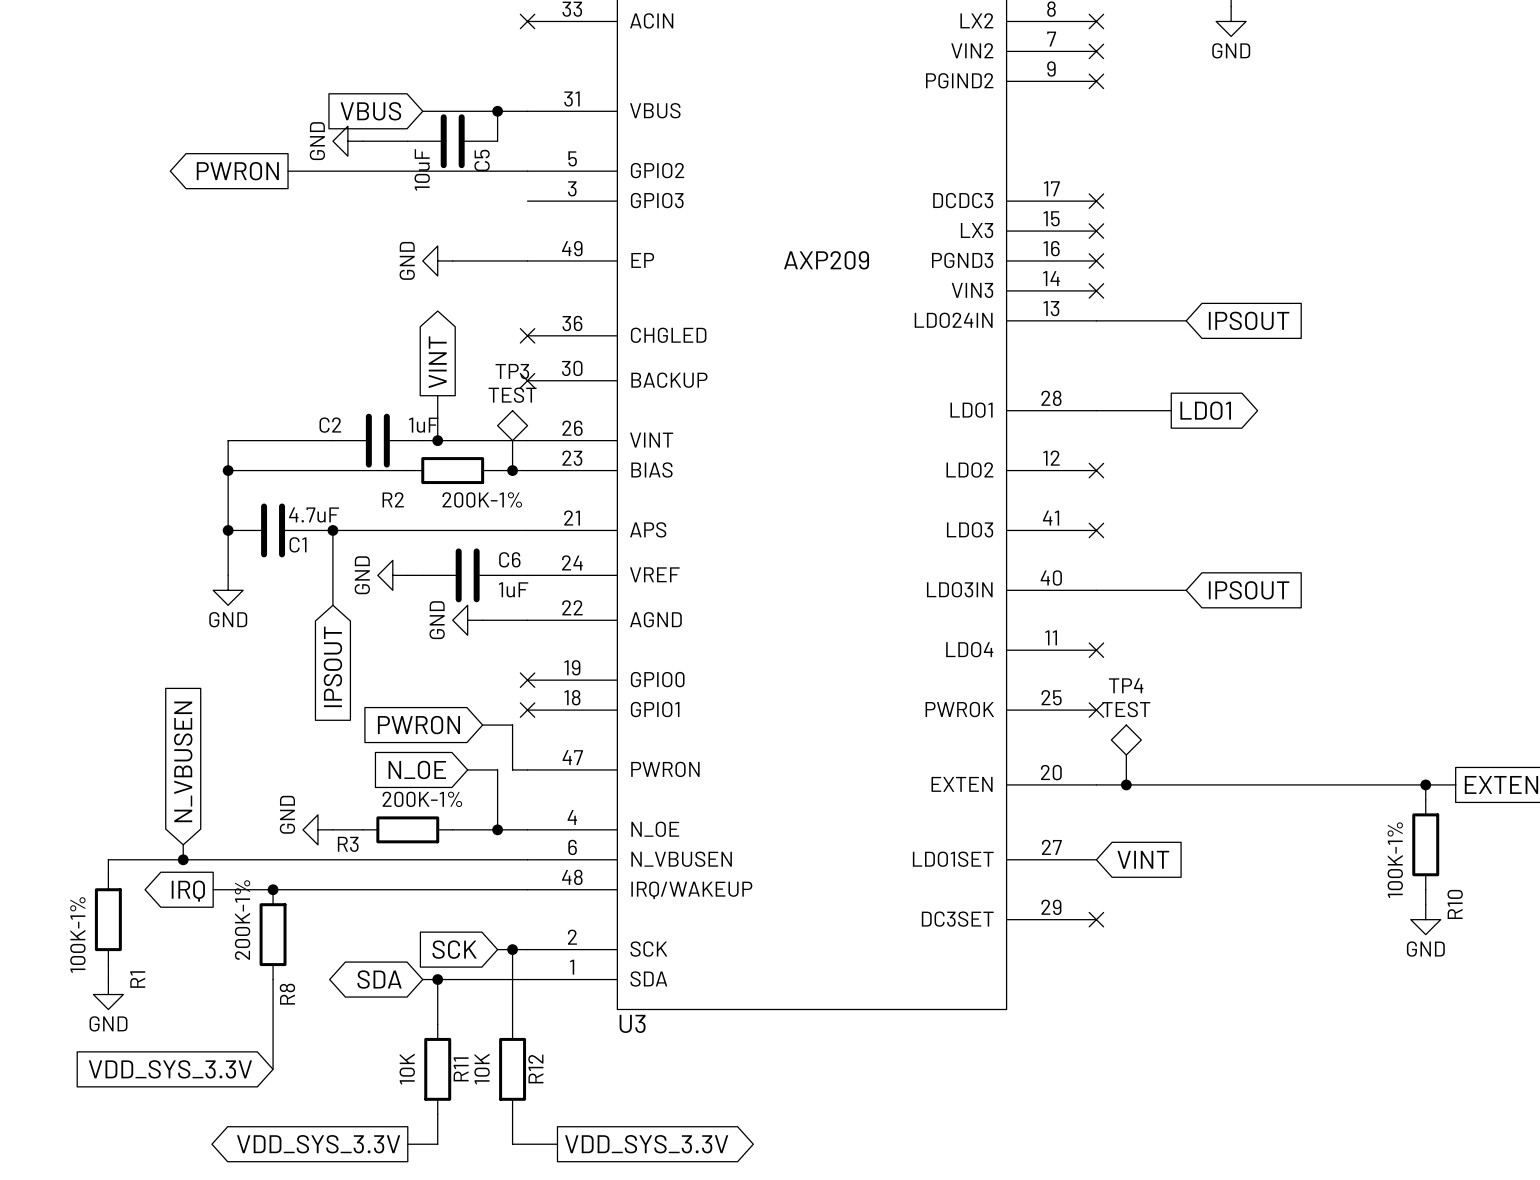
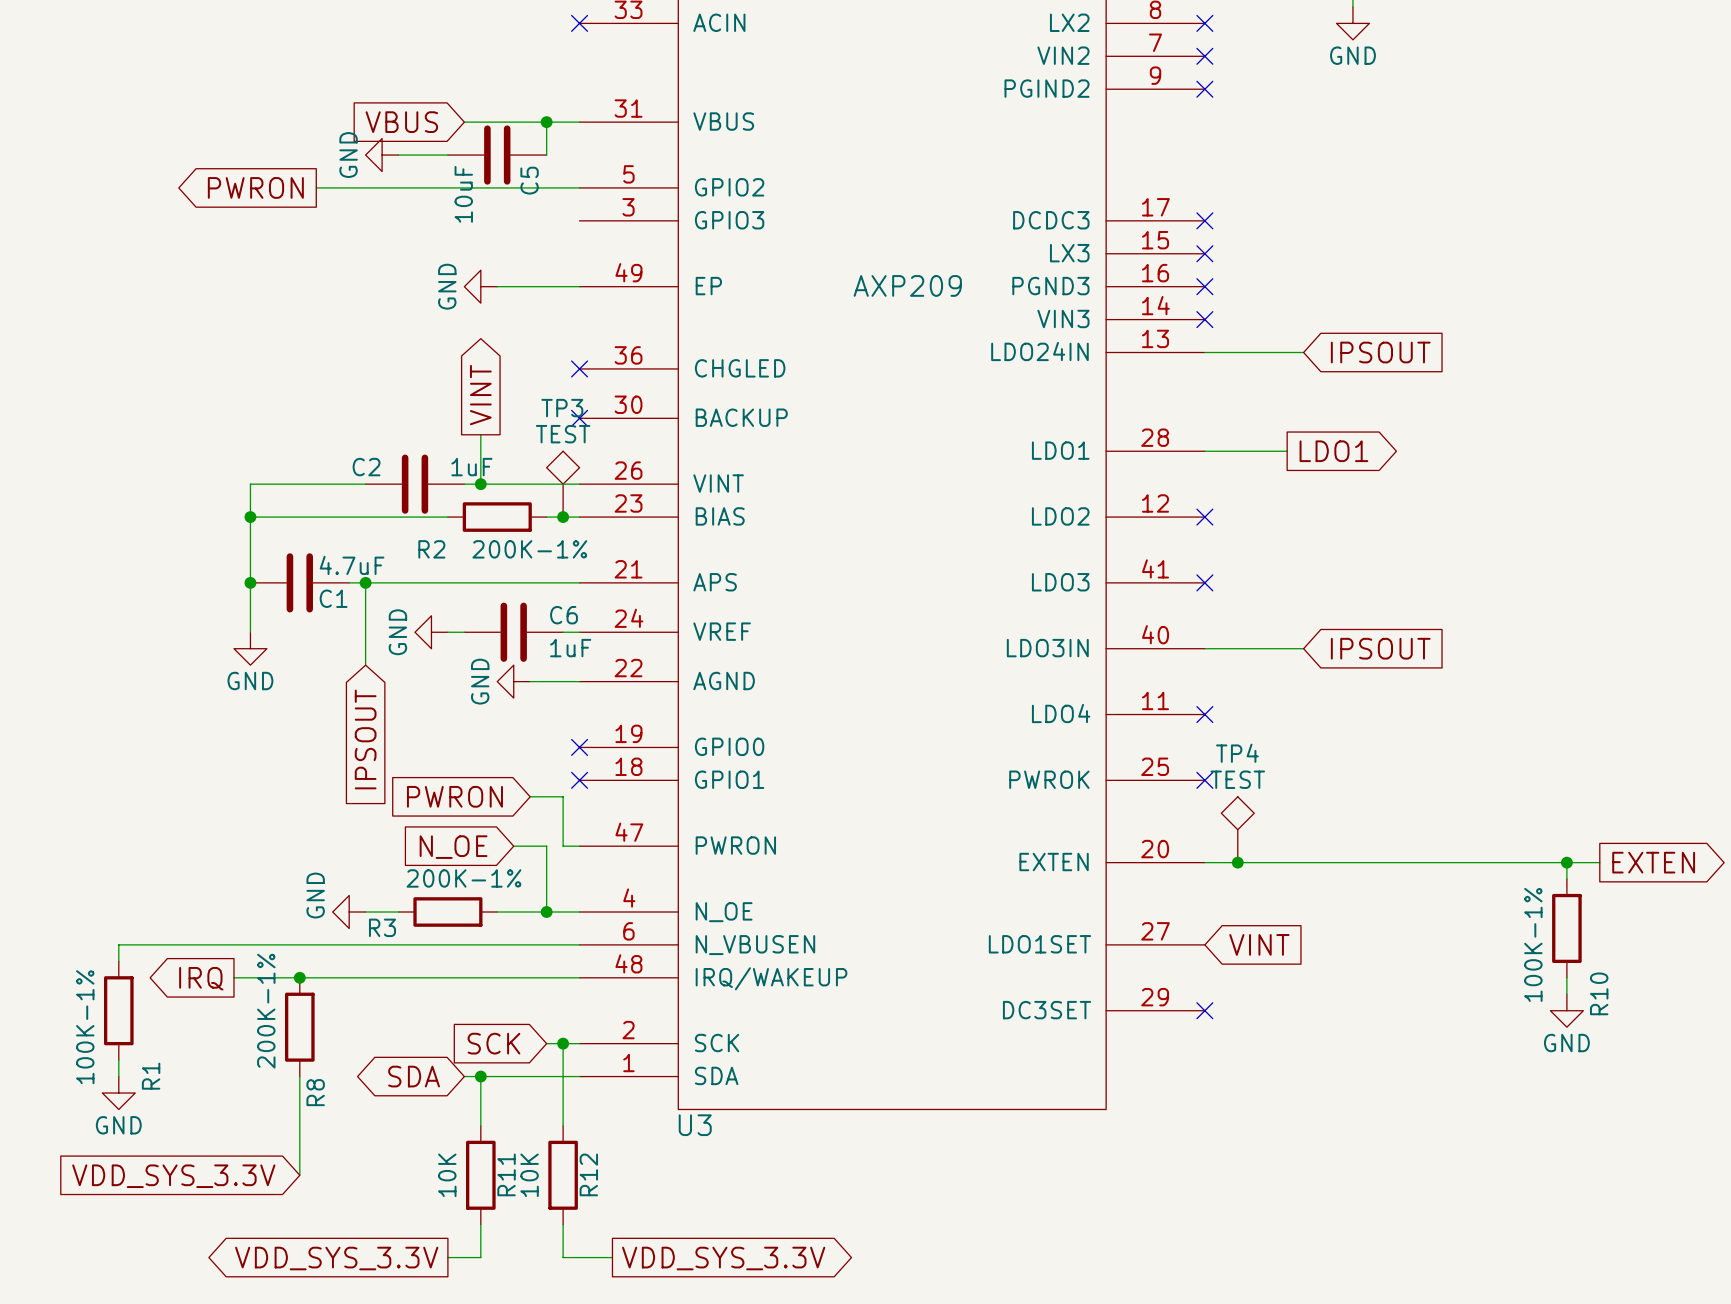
global label: N_VBUSEN (183, 761) -> none
wire: (183, 844) (183, 859) -> none
junction: (183, 859) -> none

